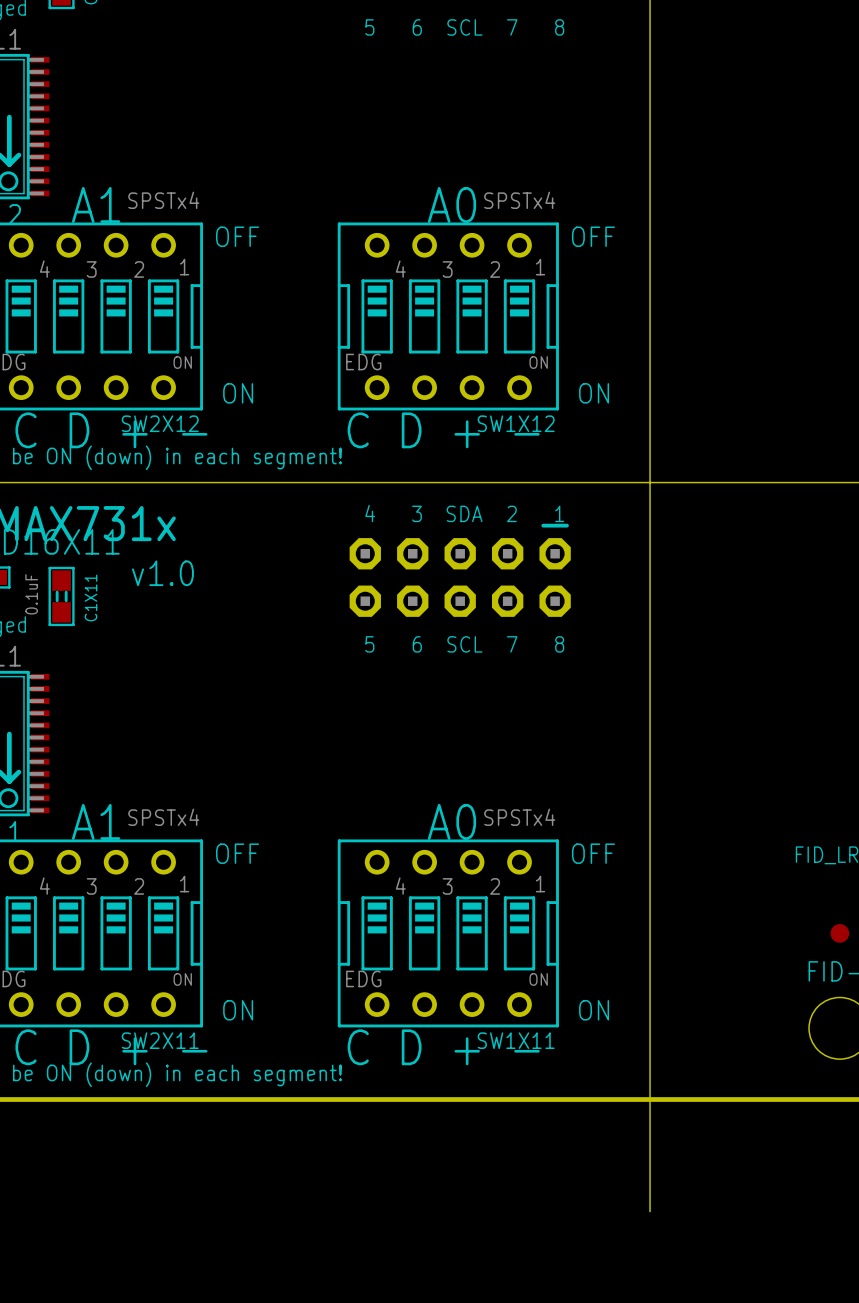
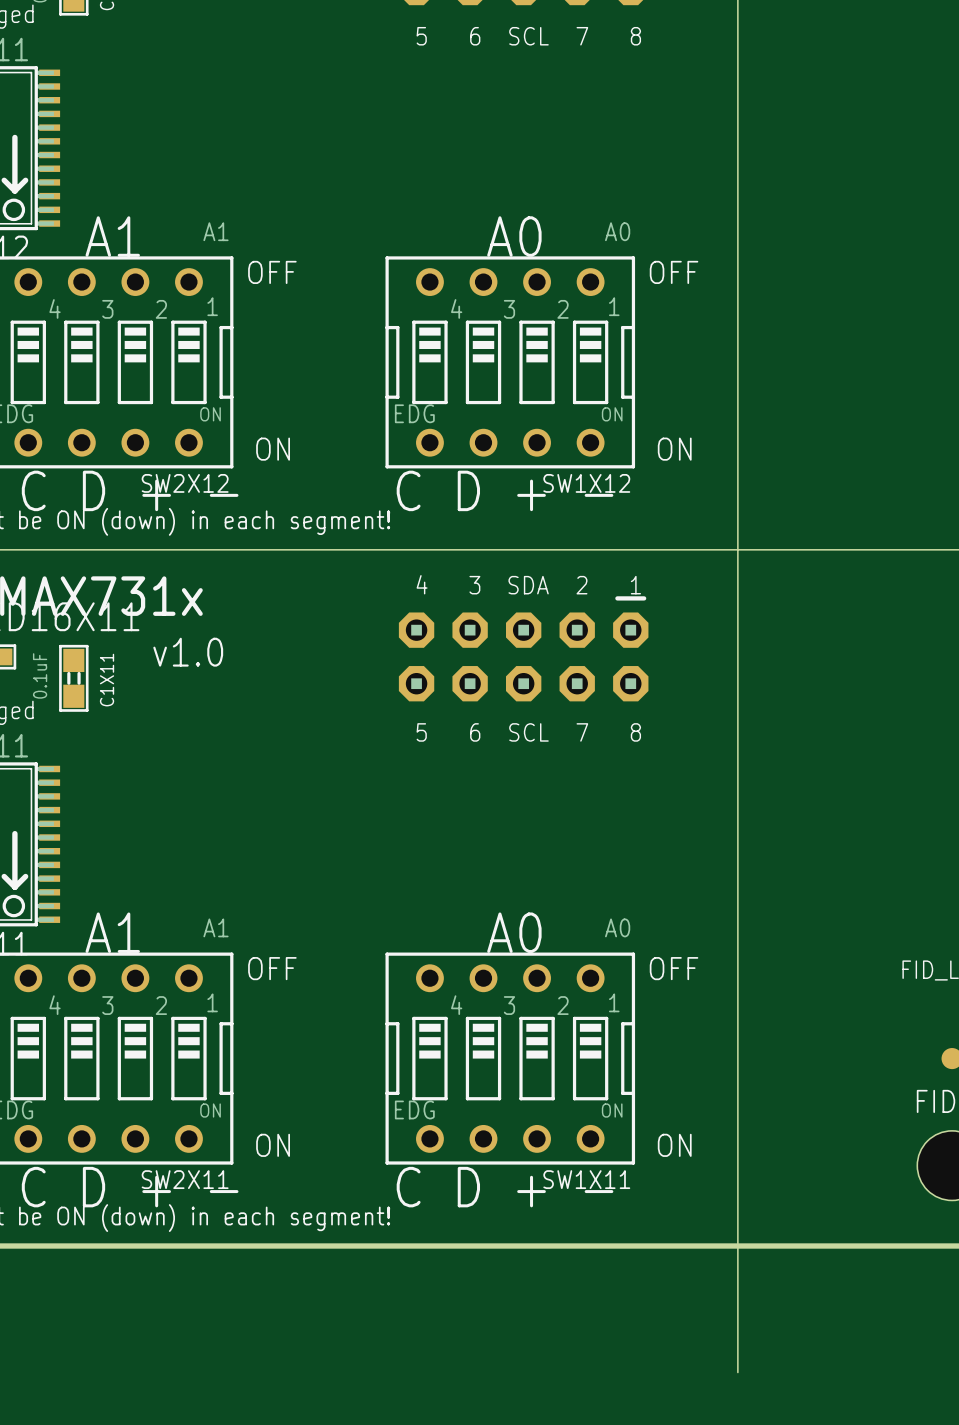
SW2X12 value: SPSTx4 (163, 200) -> A1 (215, 231)
SW1X12 value: SPSTx4 (519, 200) -> A0 (617, 231)
SW2X11 value: SPSTx4 (163, 817) -> A1 (215, 927)
SW1X11 value: SPSTx4 (519, 817) -> A0 (617, 927)

